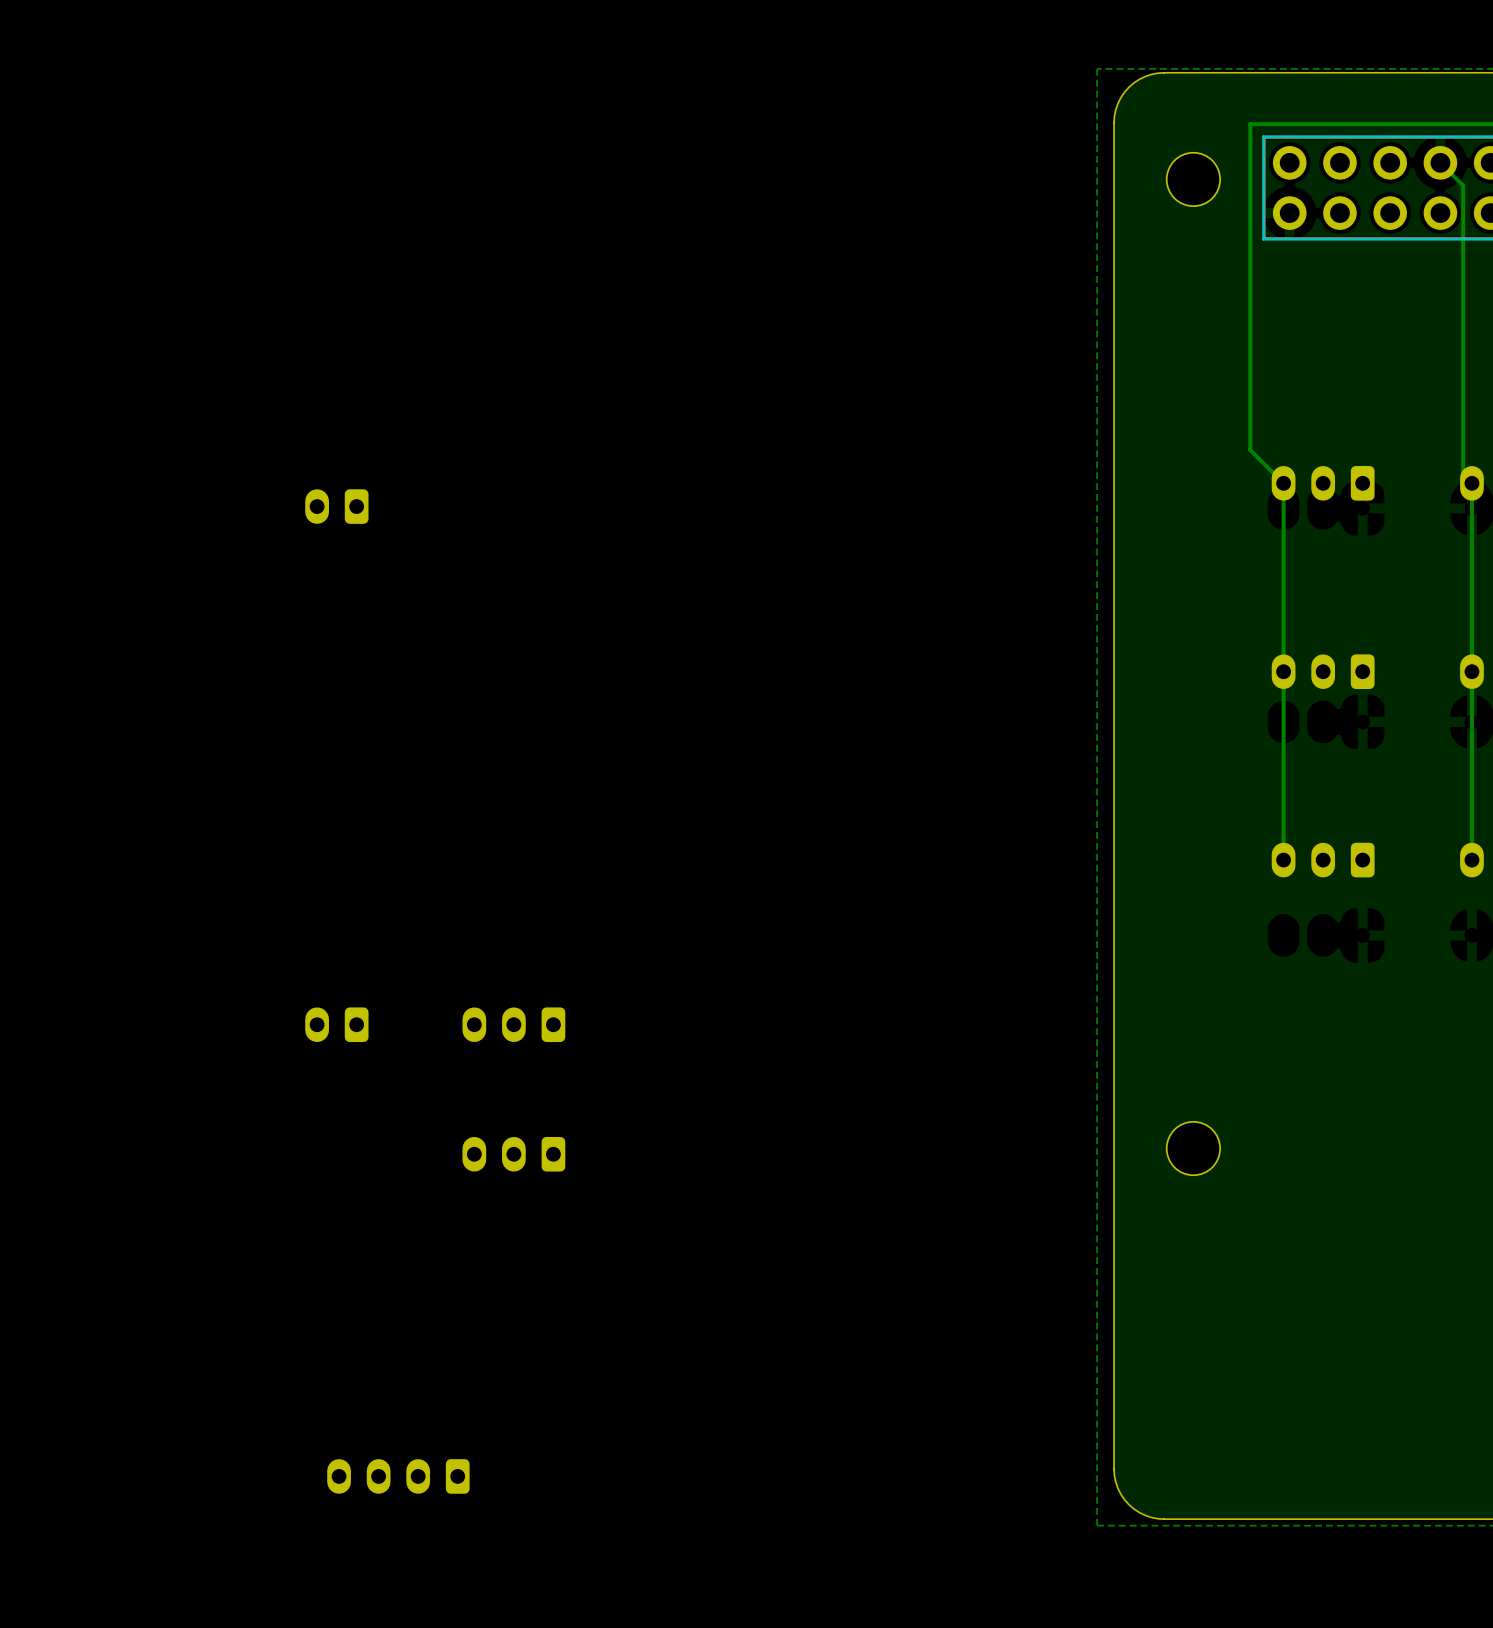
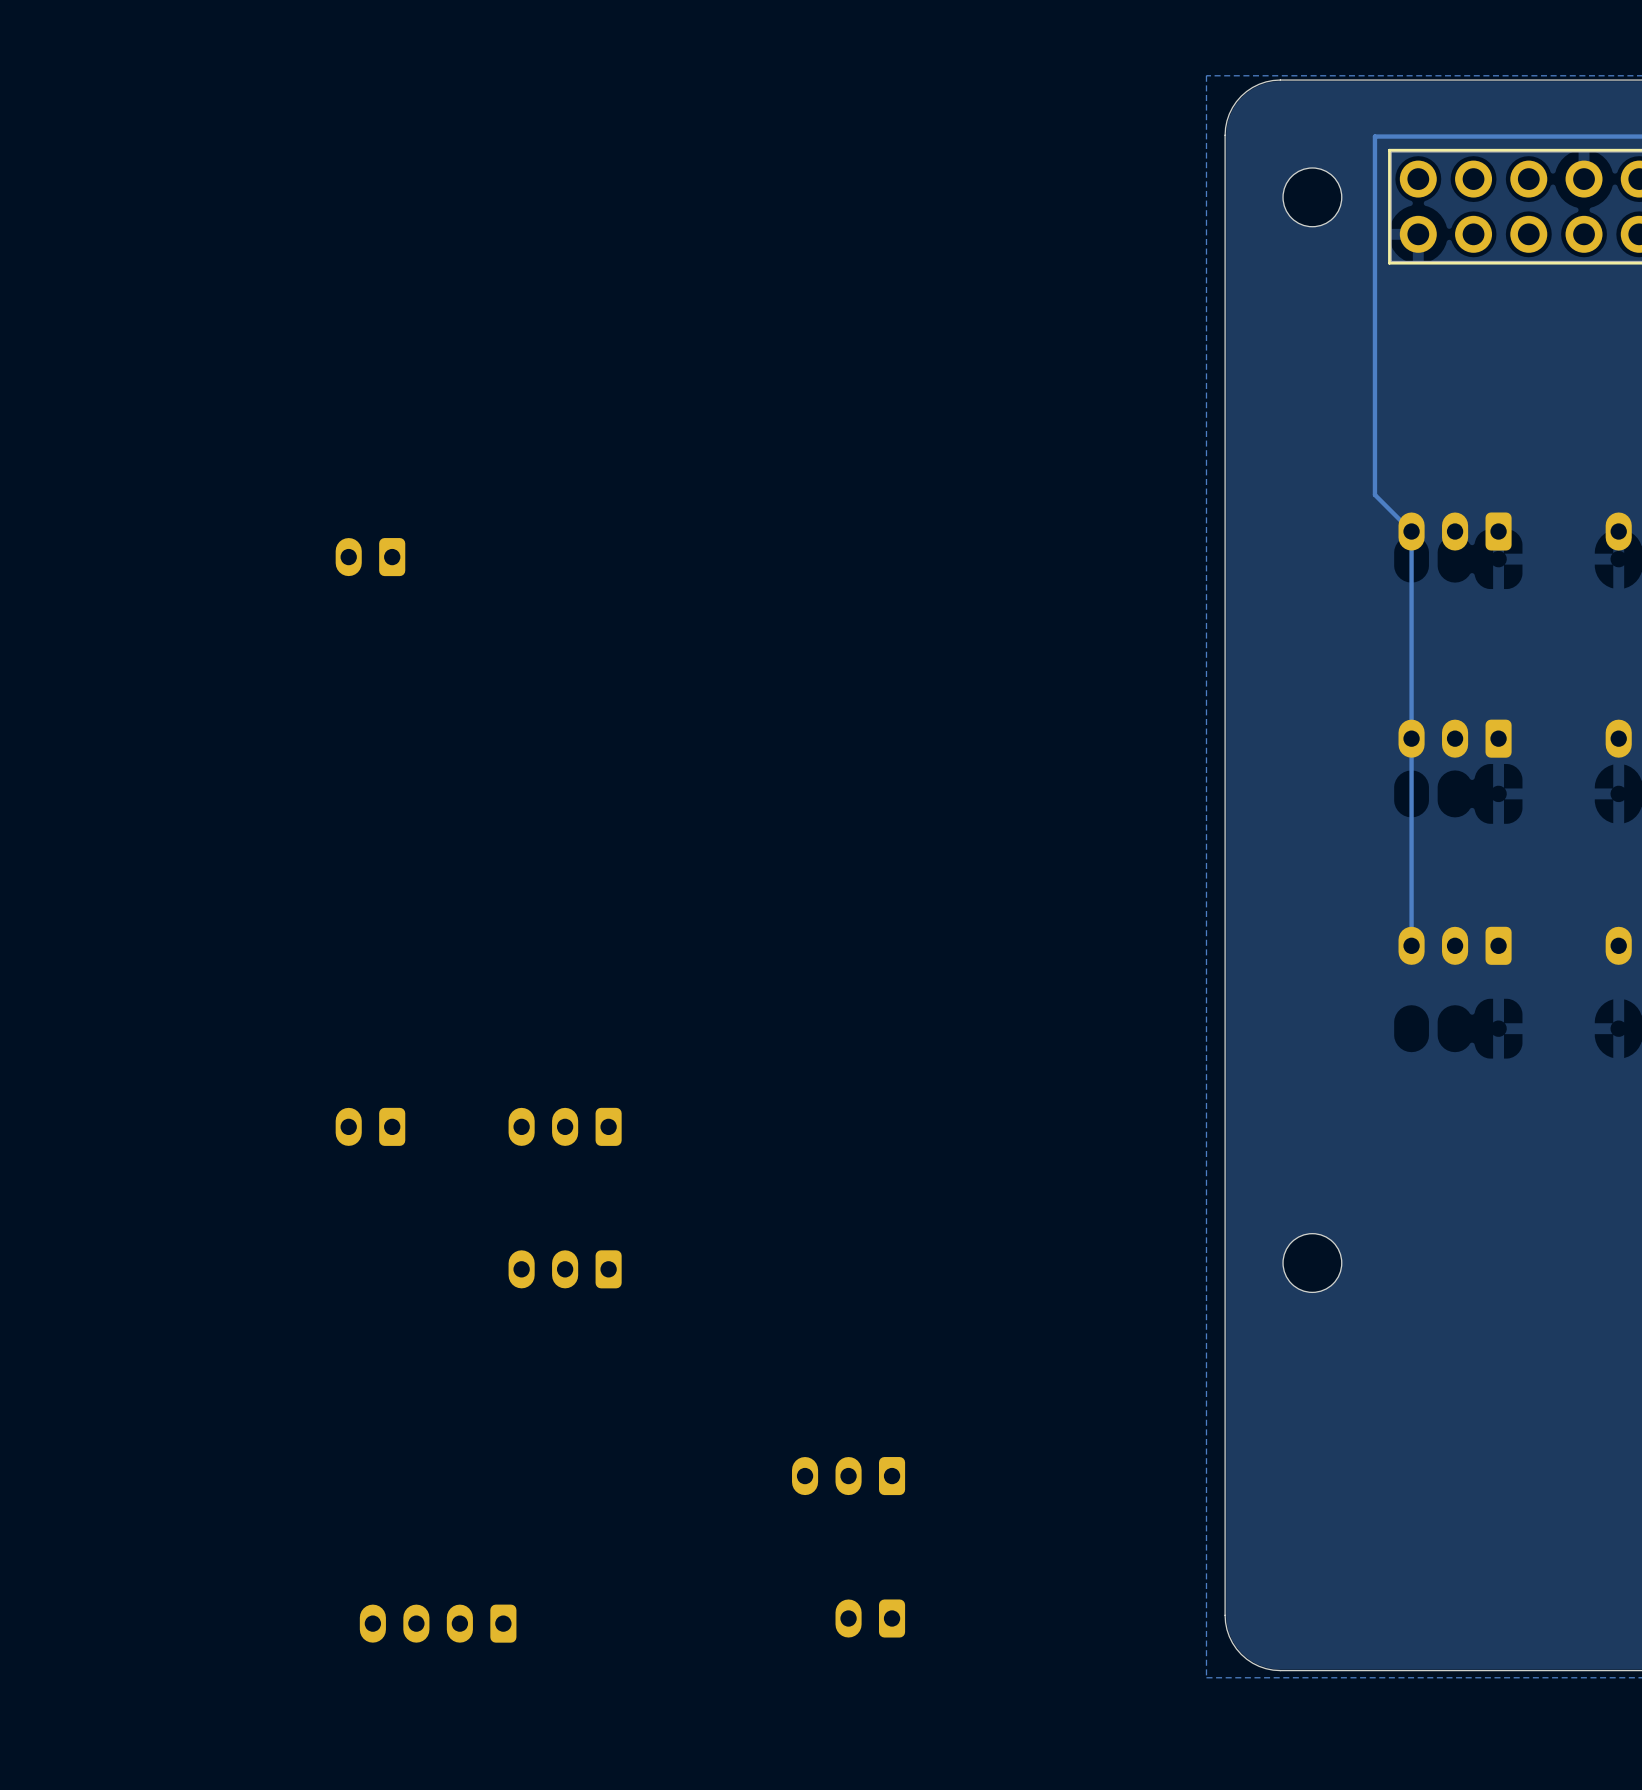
track: (1440, 162) (1463, 185) (1463, 474) -> none
track: (1471, 483) (1471, 860) -> none
part: none -> (848, 1476)
part: none -> (870, 1618)

